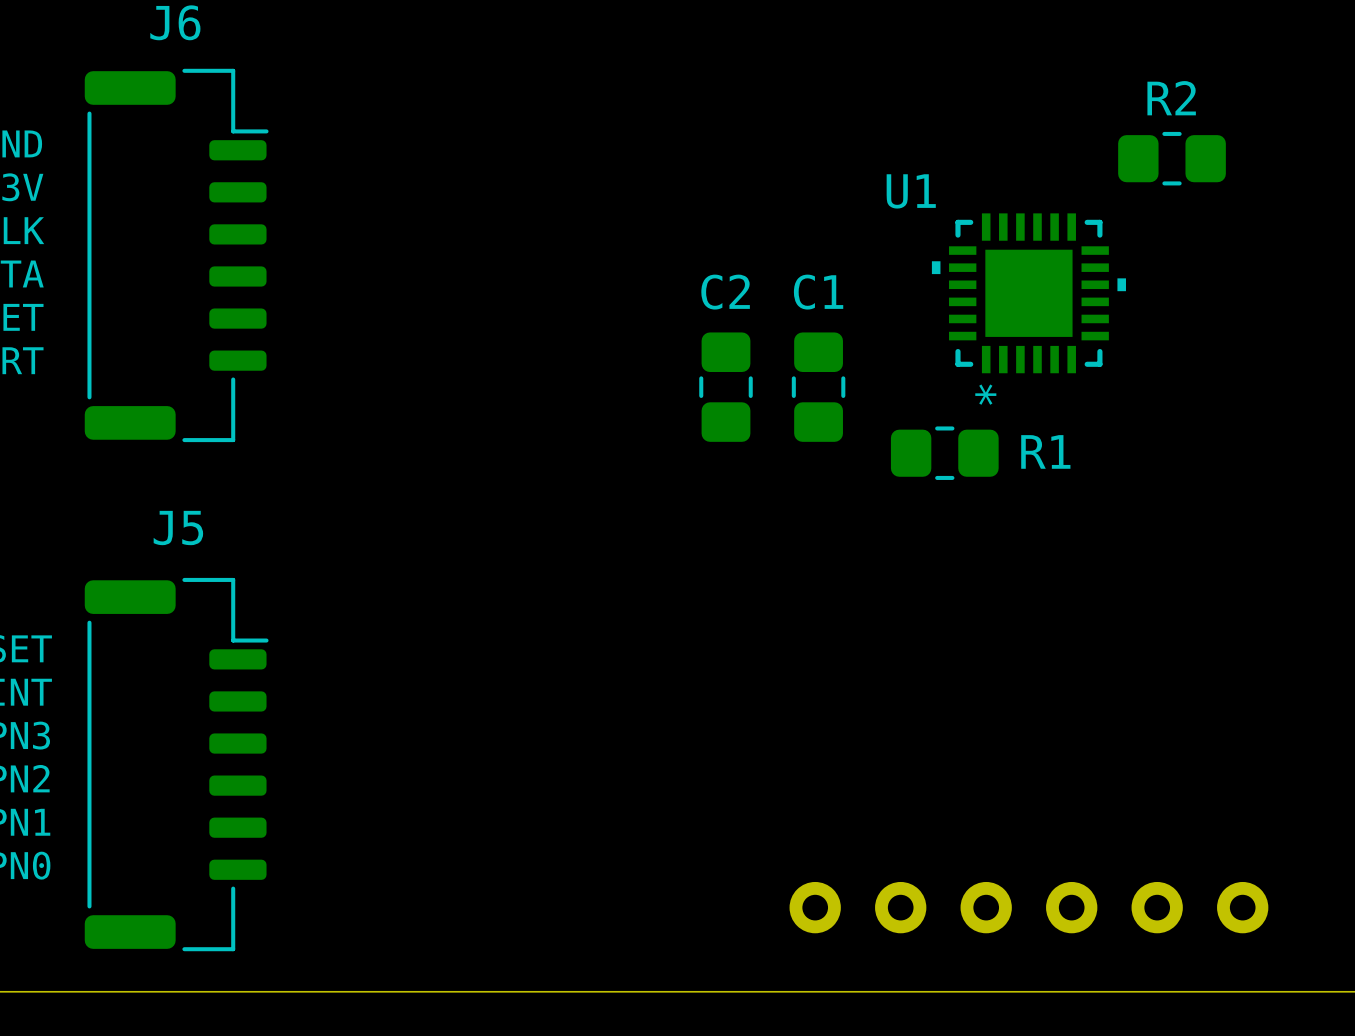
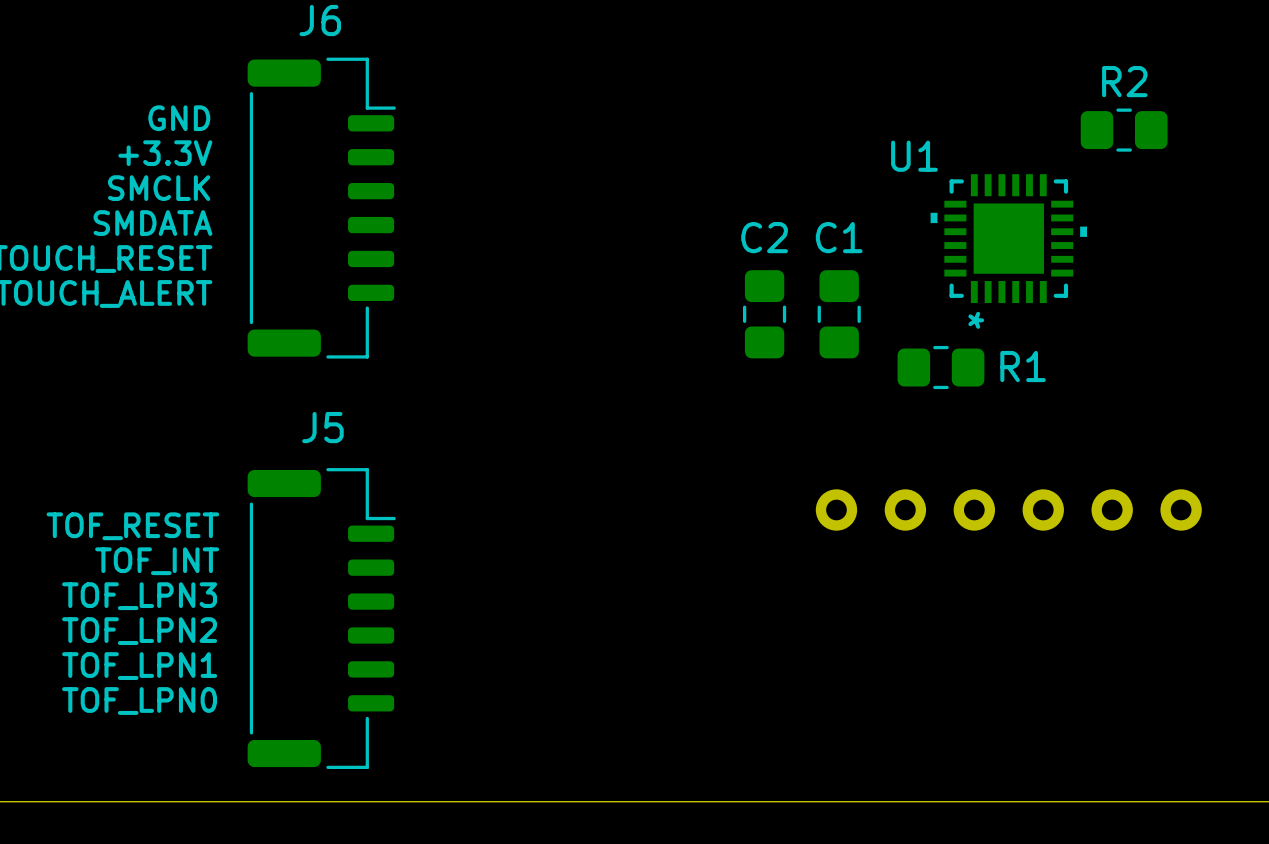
part position: (1028, 907) -> (1008, 509)

